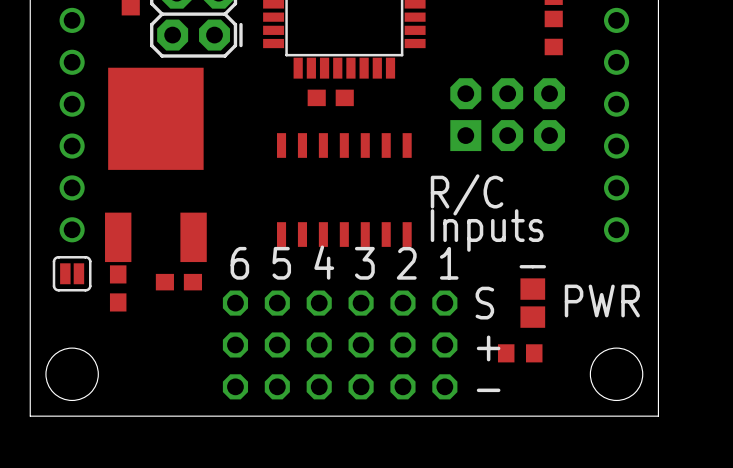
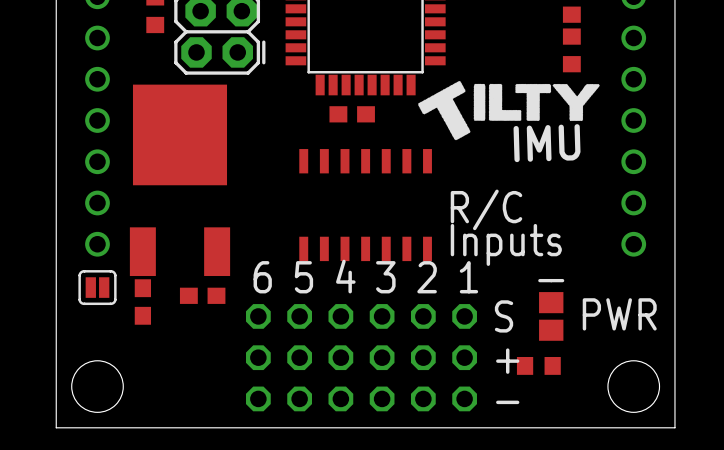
drawing: none -> [418, 80, 600, 141]
part: (507, 114) -> none
text: none -> IMU (547, 143)

